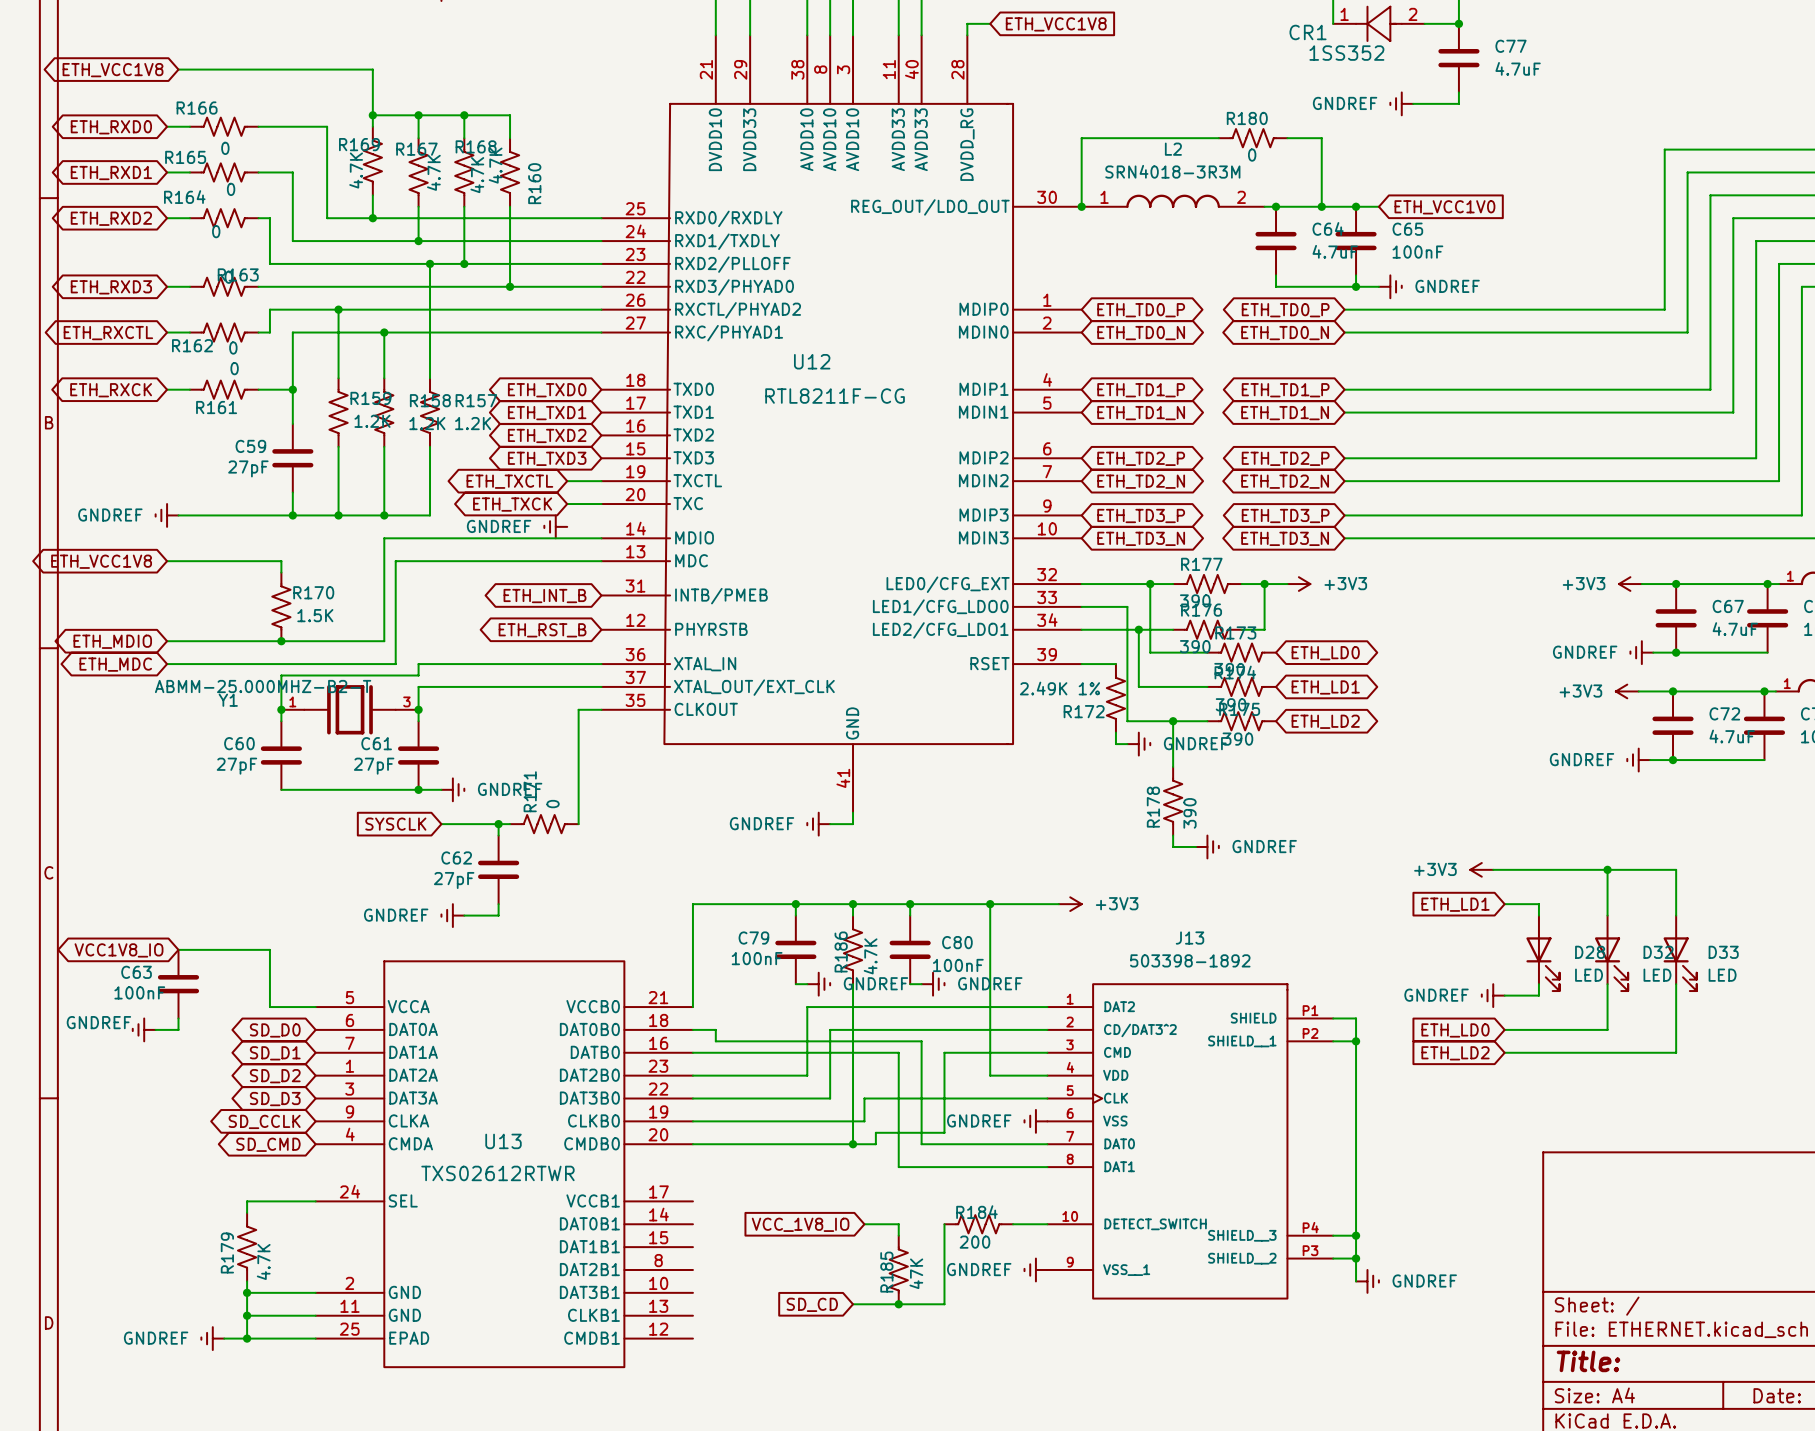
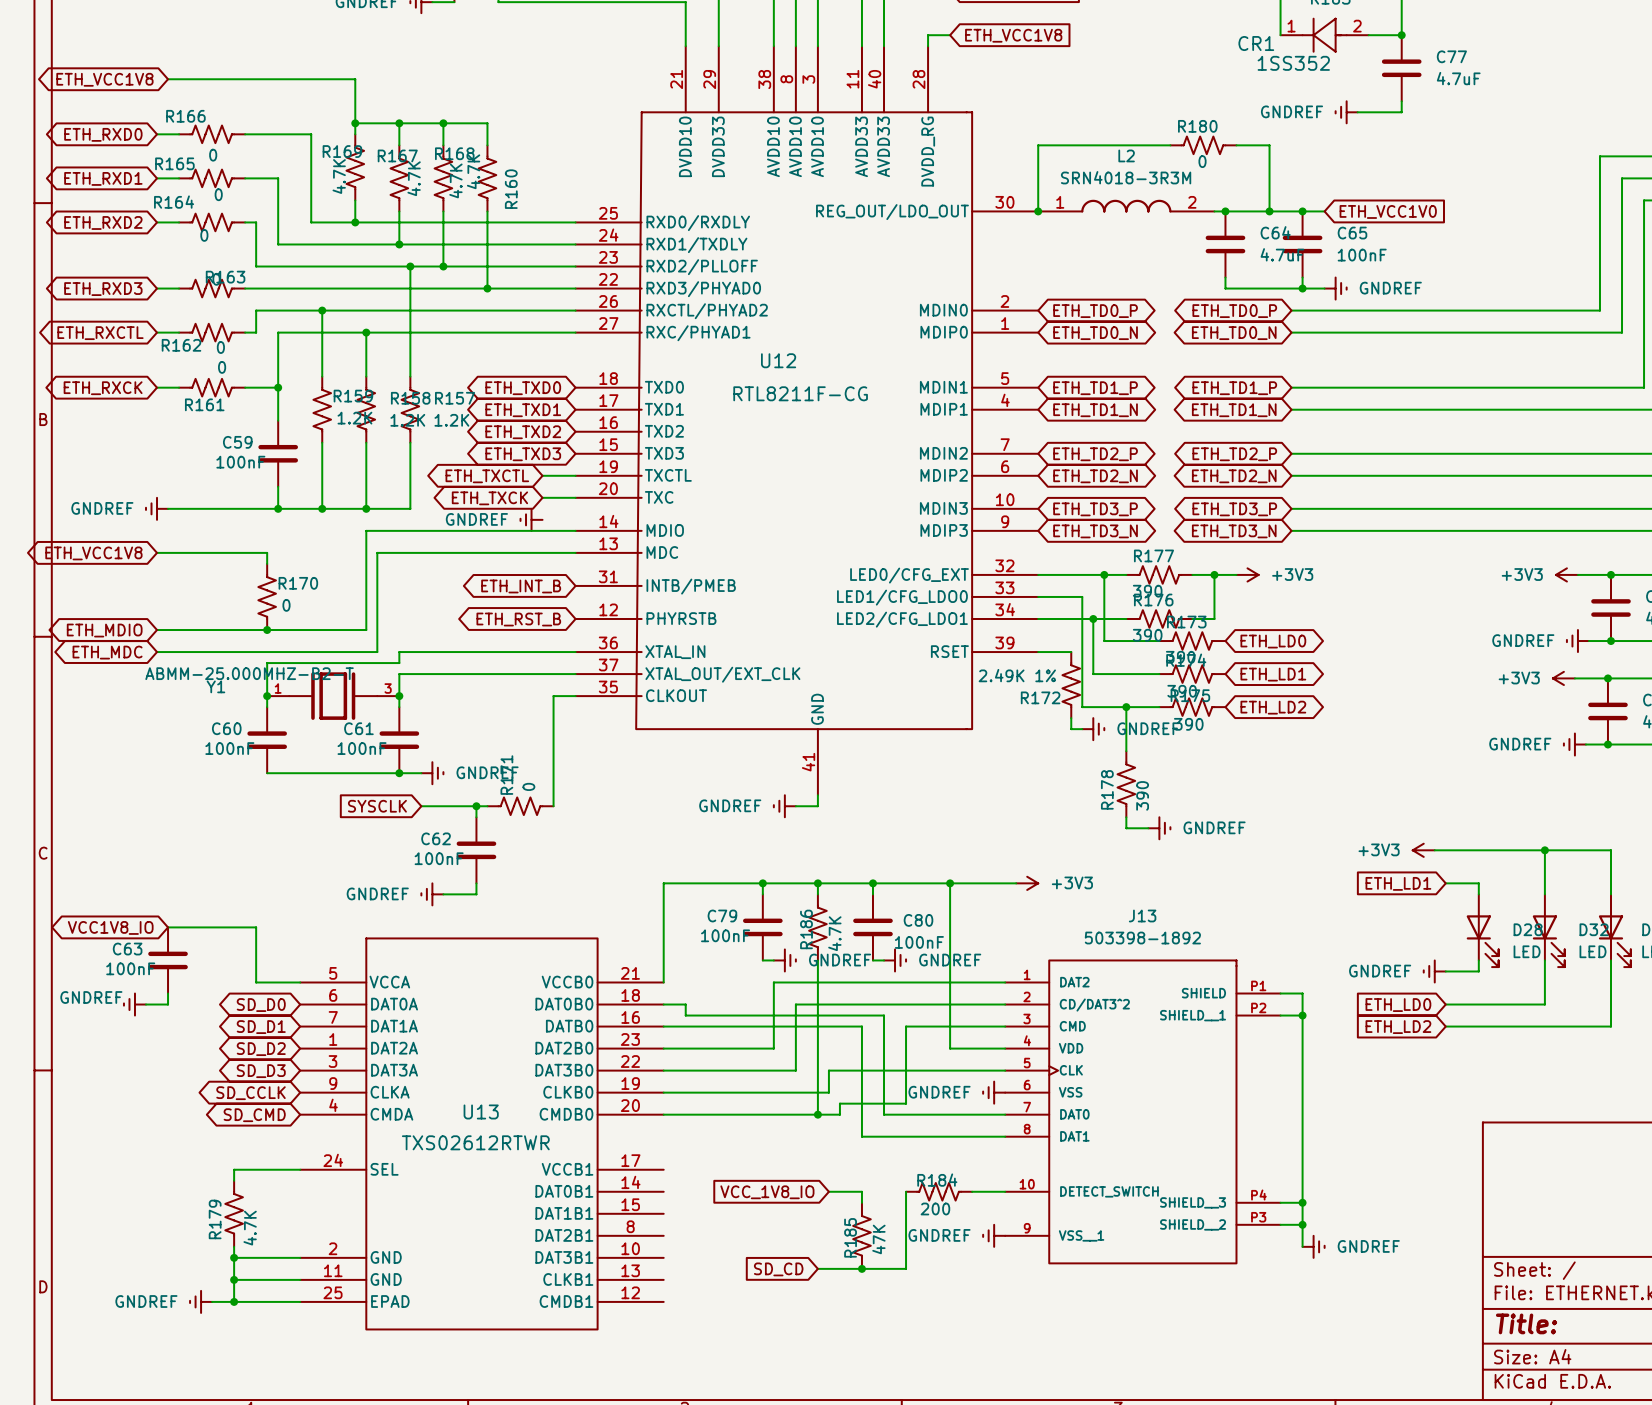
U12 symbol: [601, 35, 1082, 813] -> [575, 46, 1039, 796]
C59 value: 27pF (248, 468) -> 100nF (240, 462)
R170 value: 1.5K (315, 615) -> 0 (286, 605)
C60 value: 27pF (236, 766) -> 100nF (229, 748)
C61 value: 27pF (374, 766) -> 100nF (362, 748)
C62 value: 27pF (454, 880) -> 100nF (439, 858)

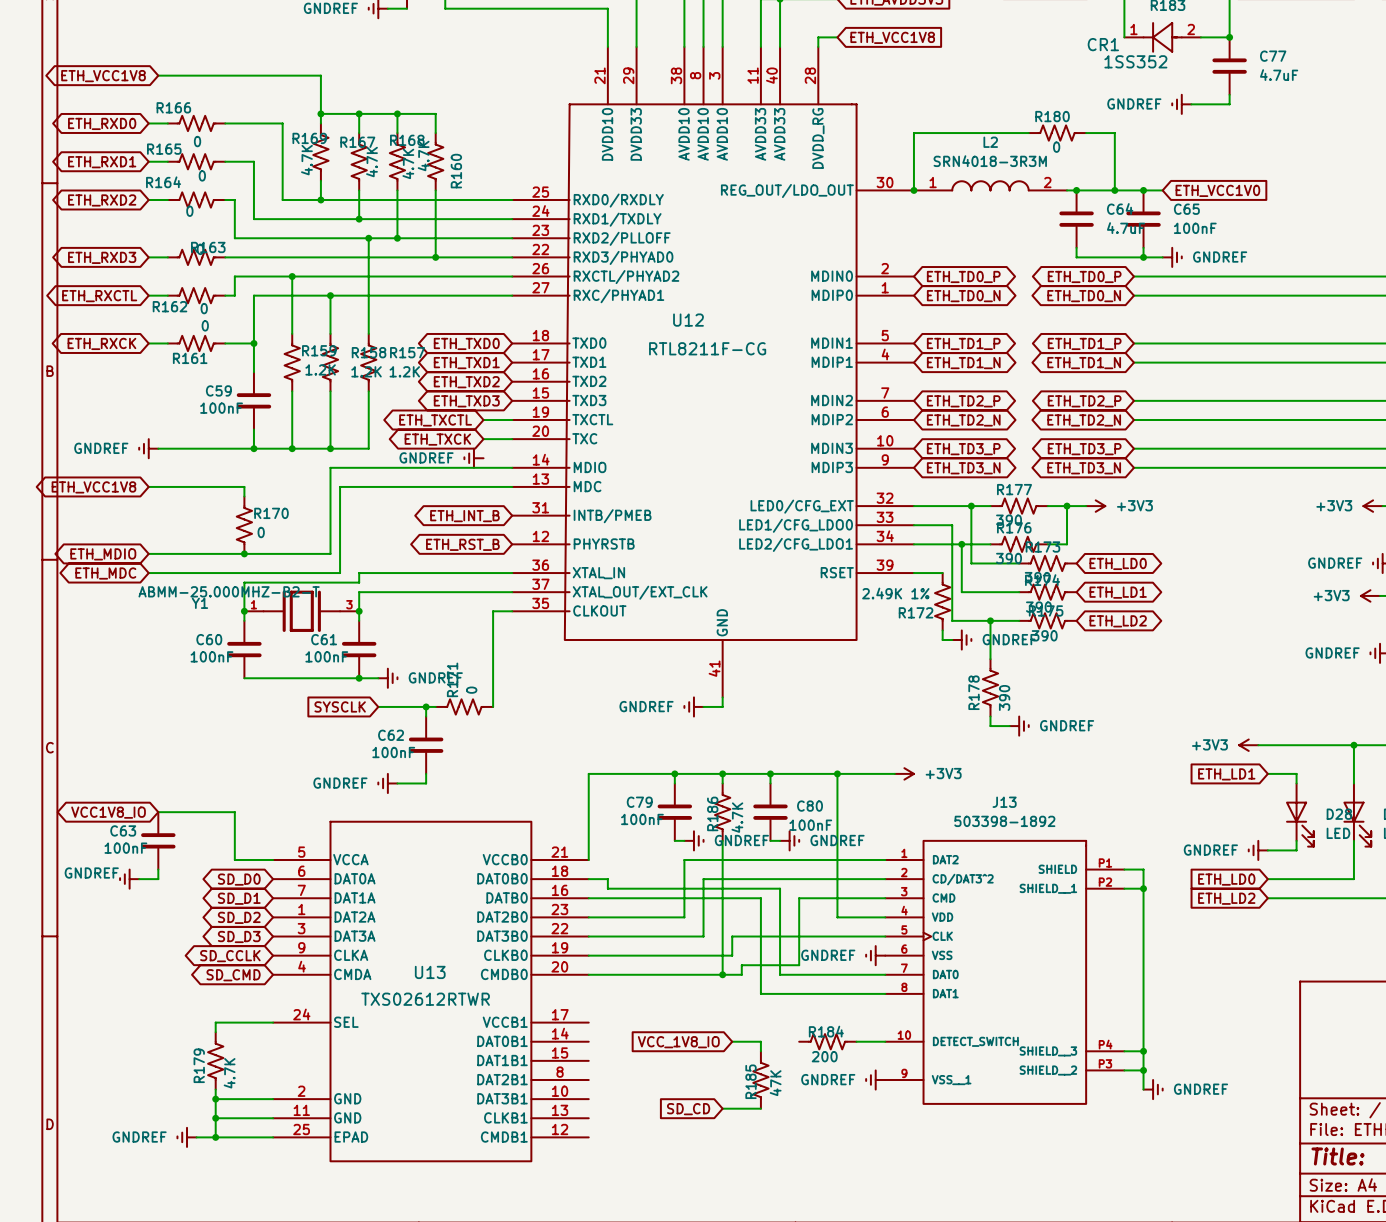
wire: (906, 1191) (906, 1268) (861, 1268) -> none
junction: (861, 1268) -> none

